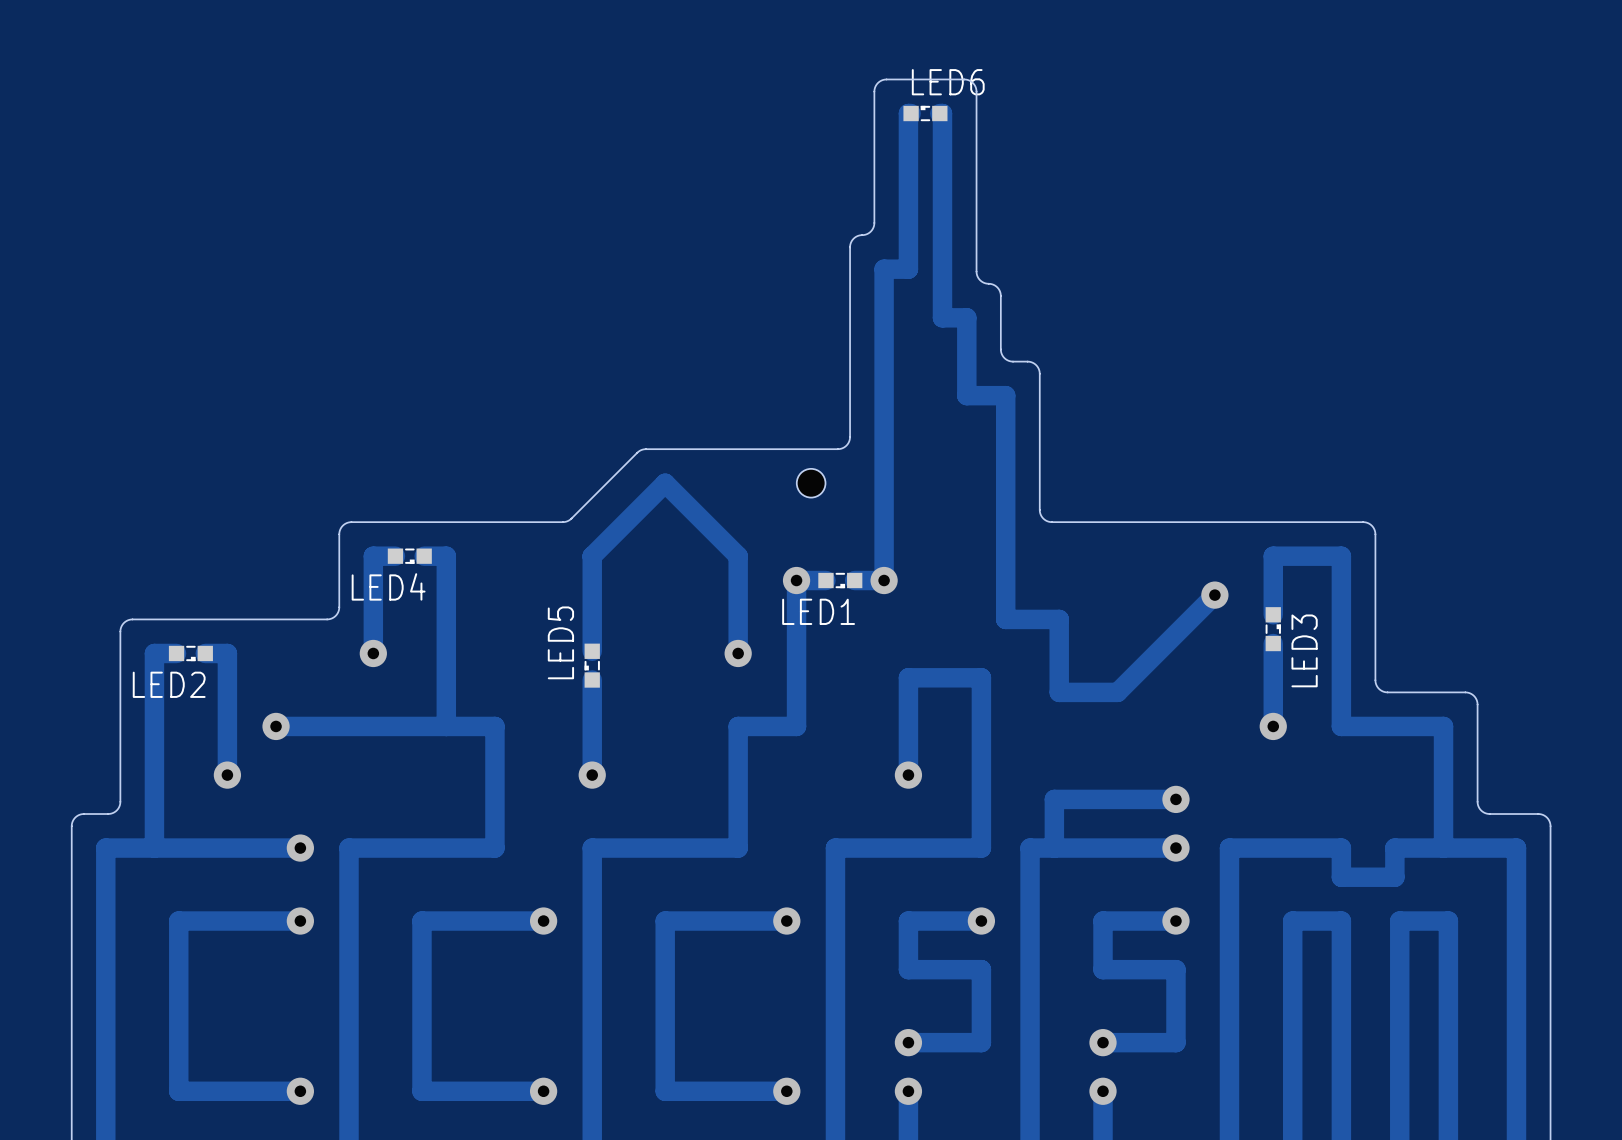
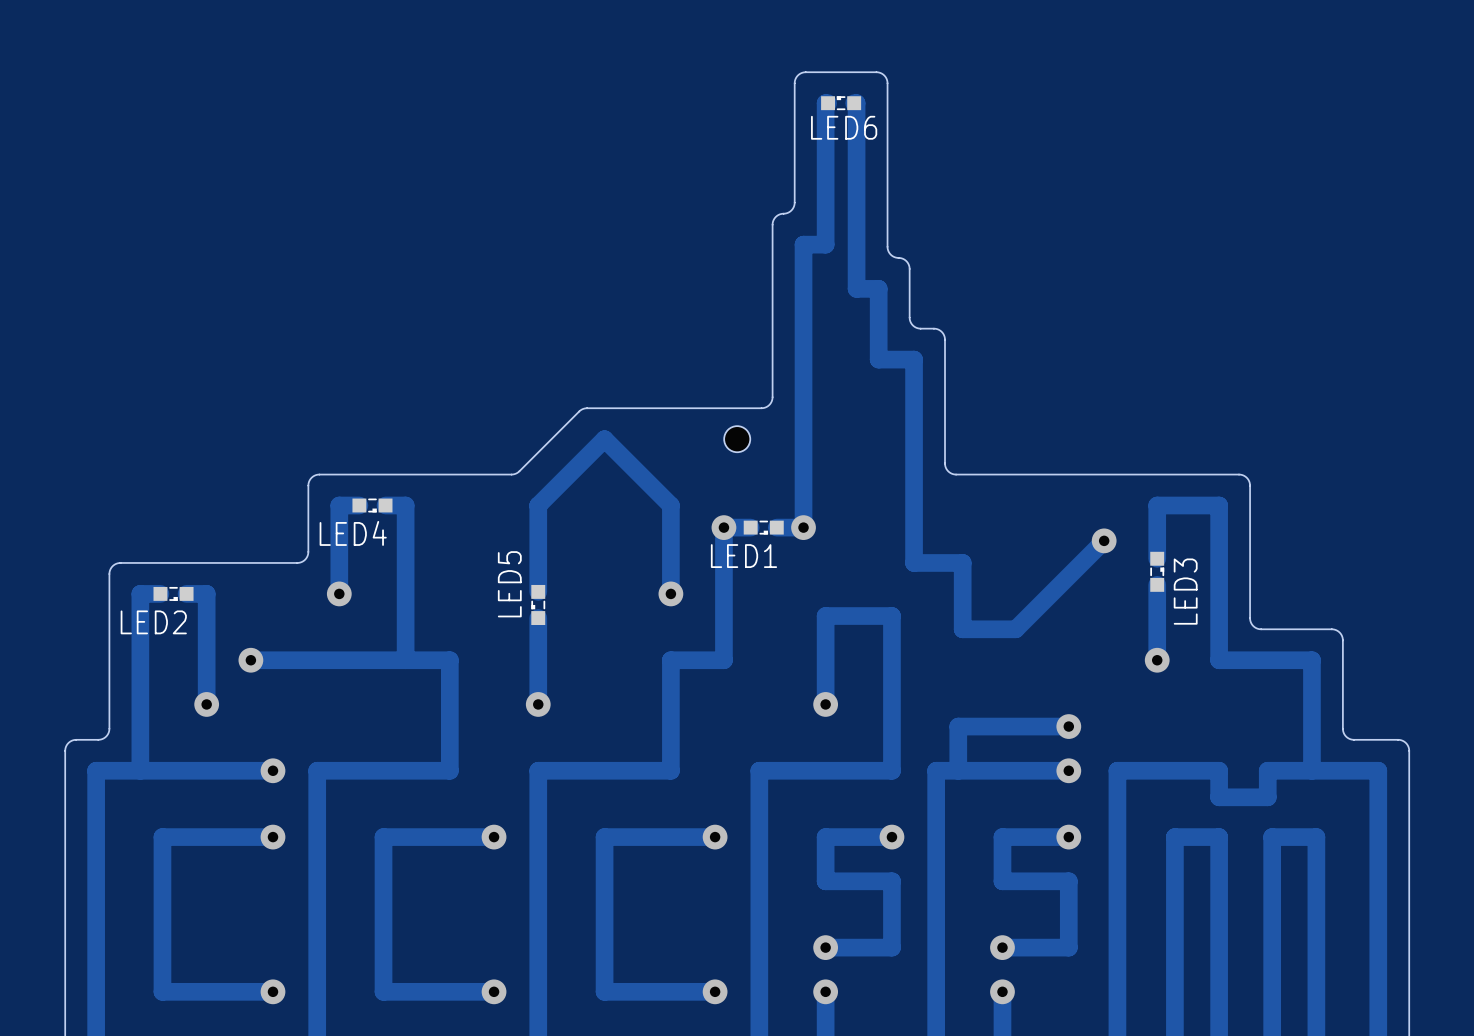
LED6 name position: LED6 (948, 82) -> LED6 (844, 127)

